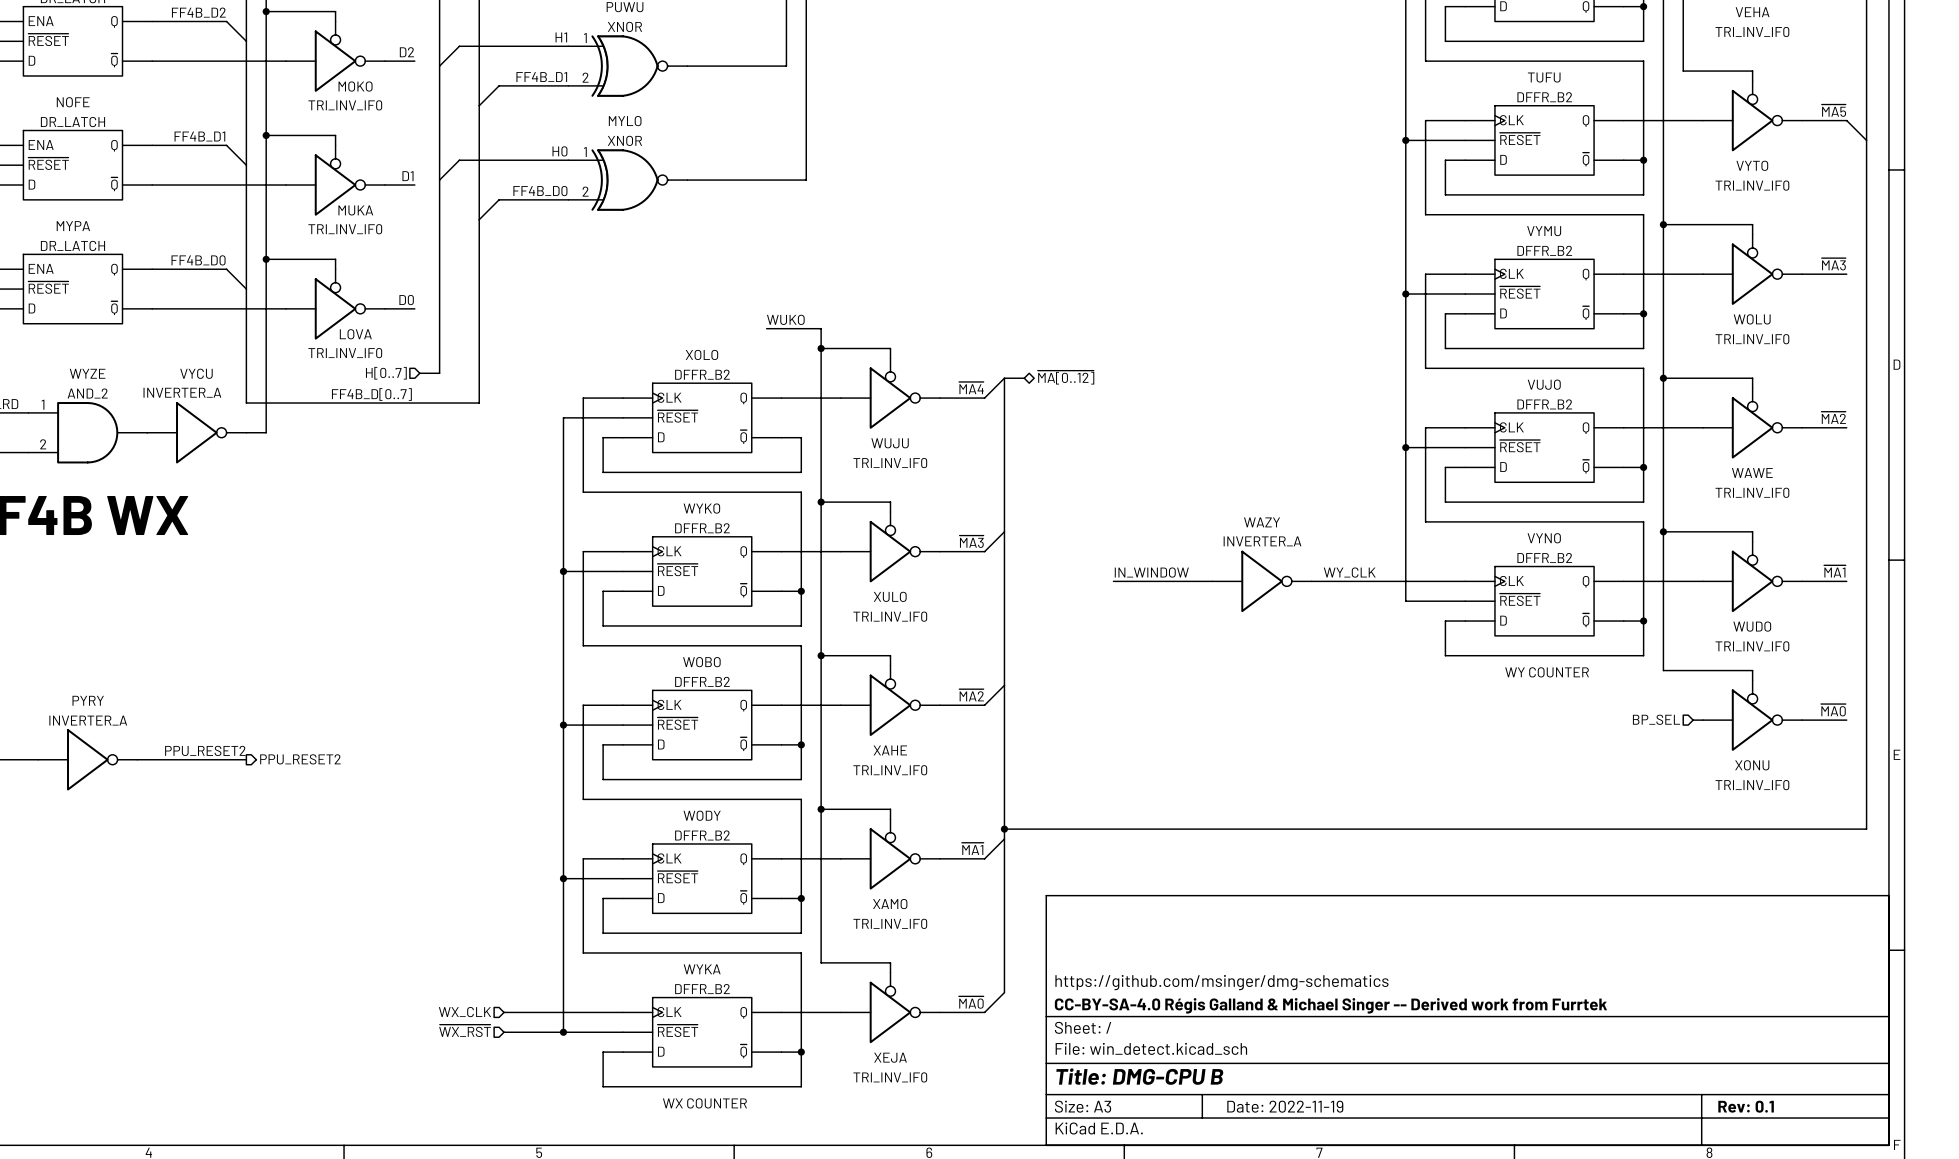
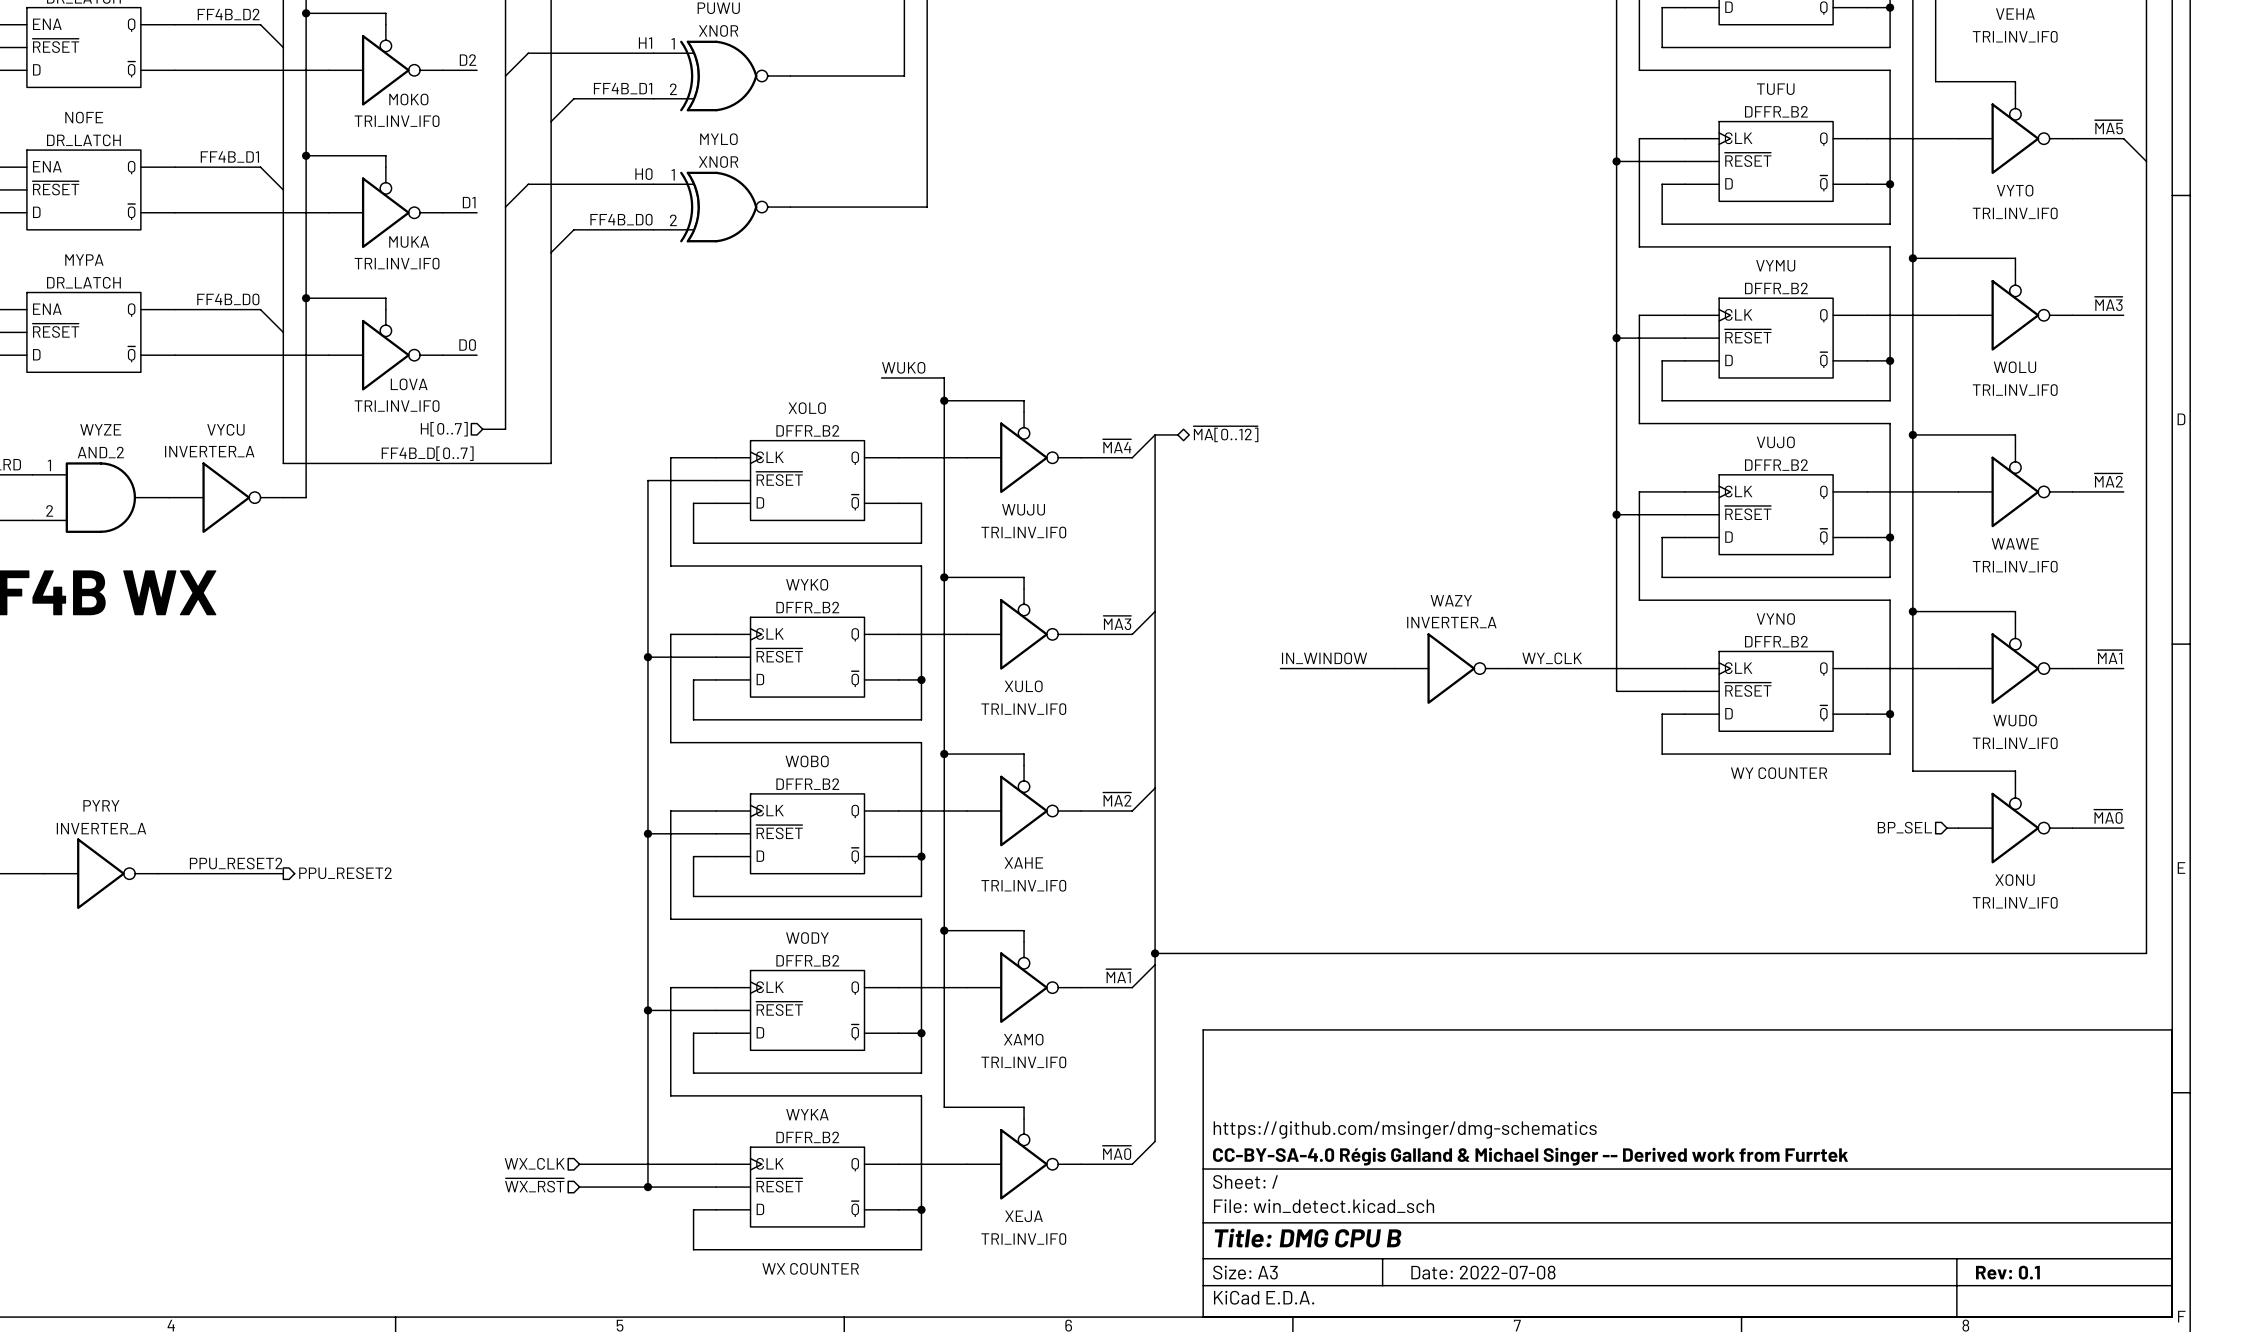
title block: Title: DMG-CPU B (1140, 1076) -> Title: DMG CPU B (1308, 1238)
title block: Date: 2022-11-19 (1285, 1106) -> Date: 2022-07-08 (1483, 1272)

